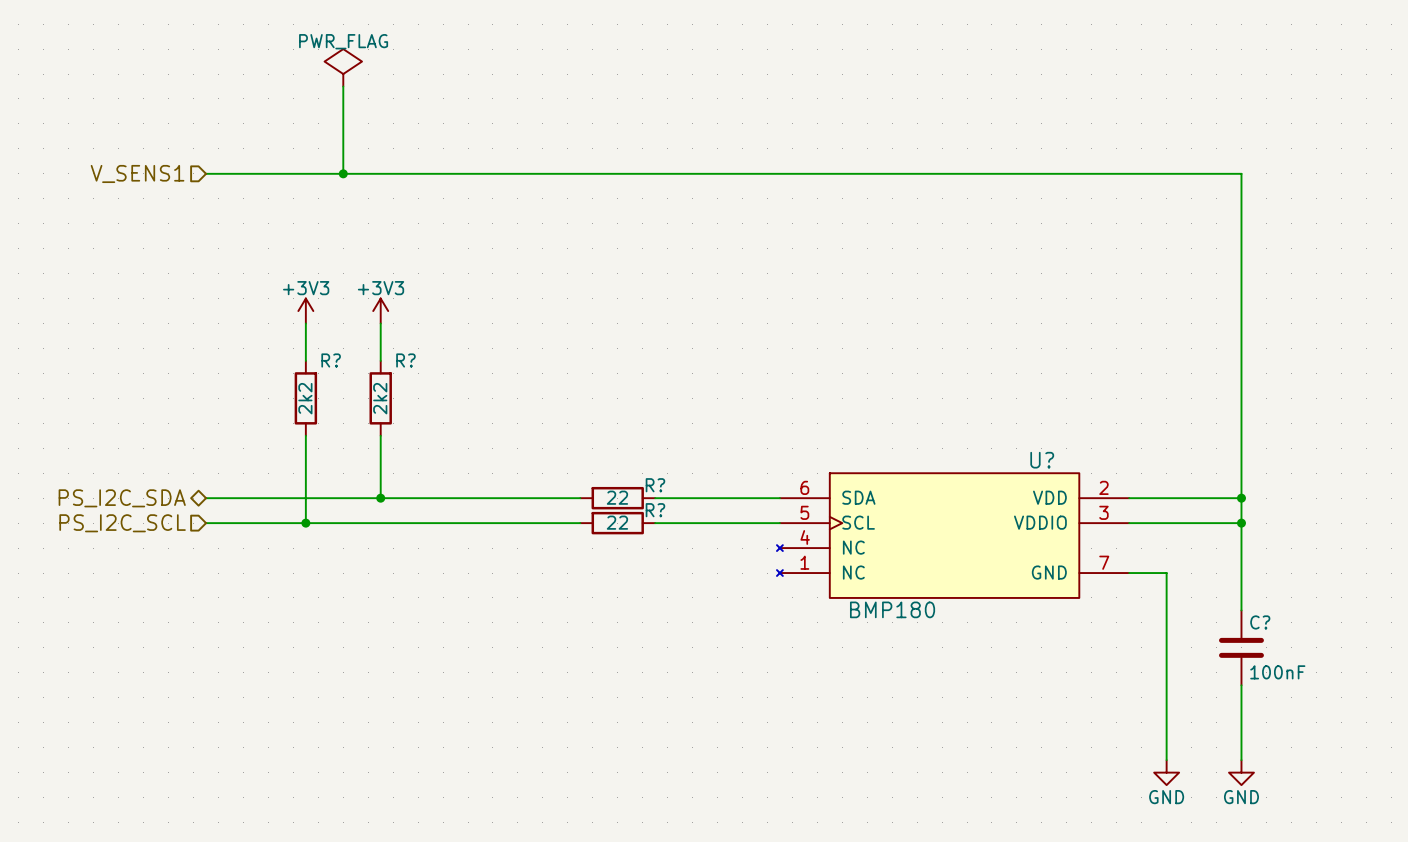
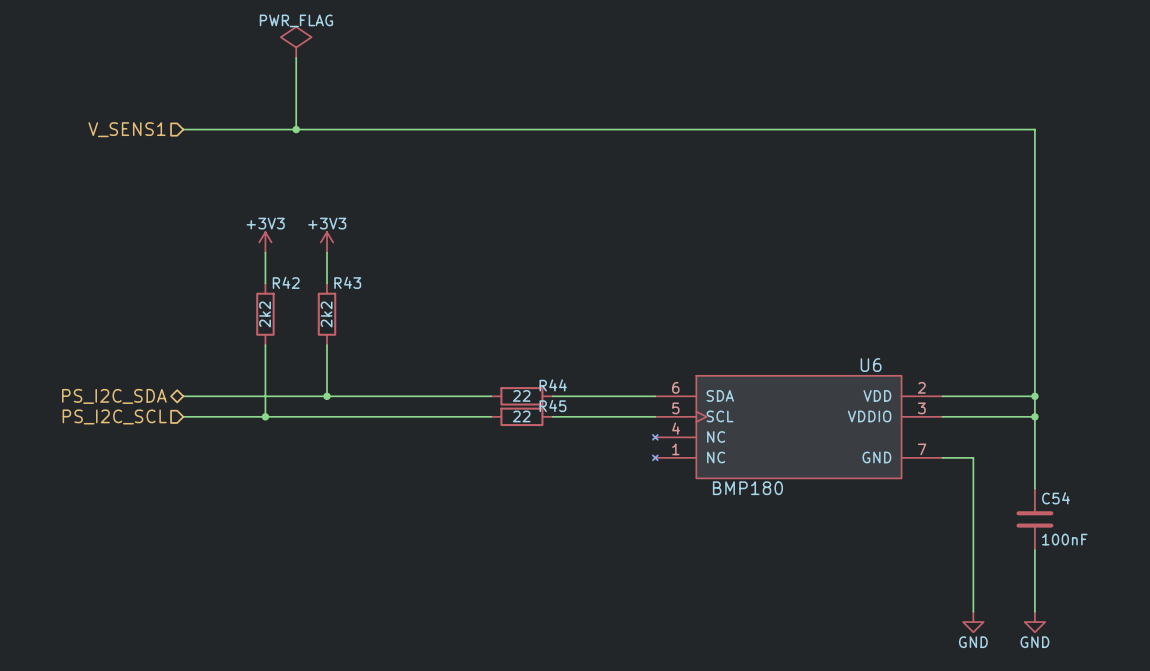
R? name: R? (331, 360) -> R42 (286, 282)
R? name: R? (405, 360) -> R43 (347, 282)
U? name: U? (1042, 460) -> U6 (871, 365)
R? name: R? (655, 485) -> R44 (553, 385)
R? name: R? (655, 510) -> R45 (552, 405)
C? name: C? (1260, 622) -> C54 (1056, 498)

